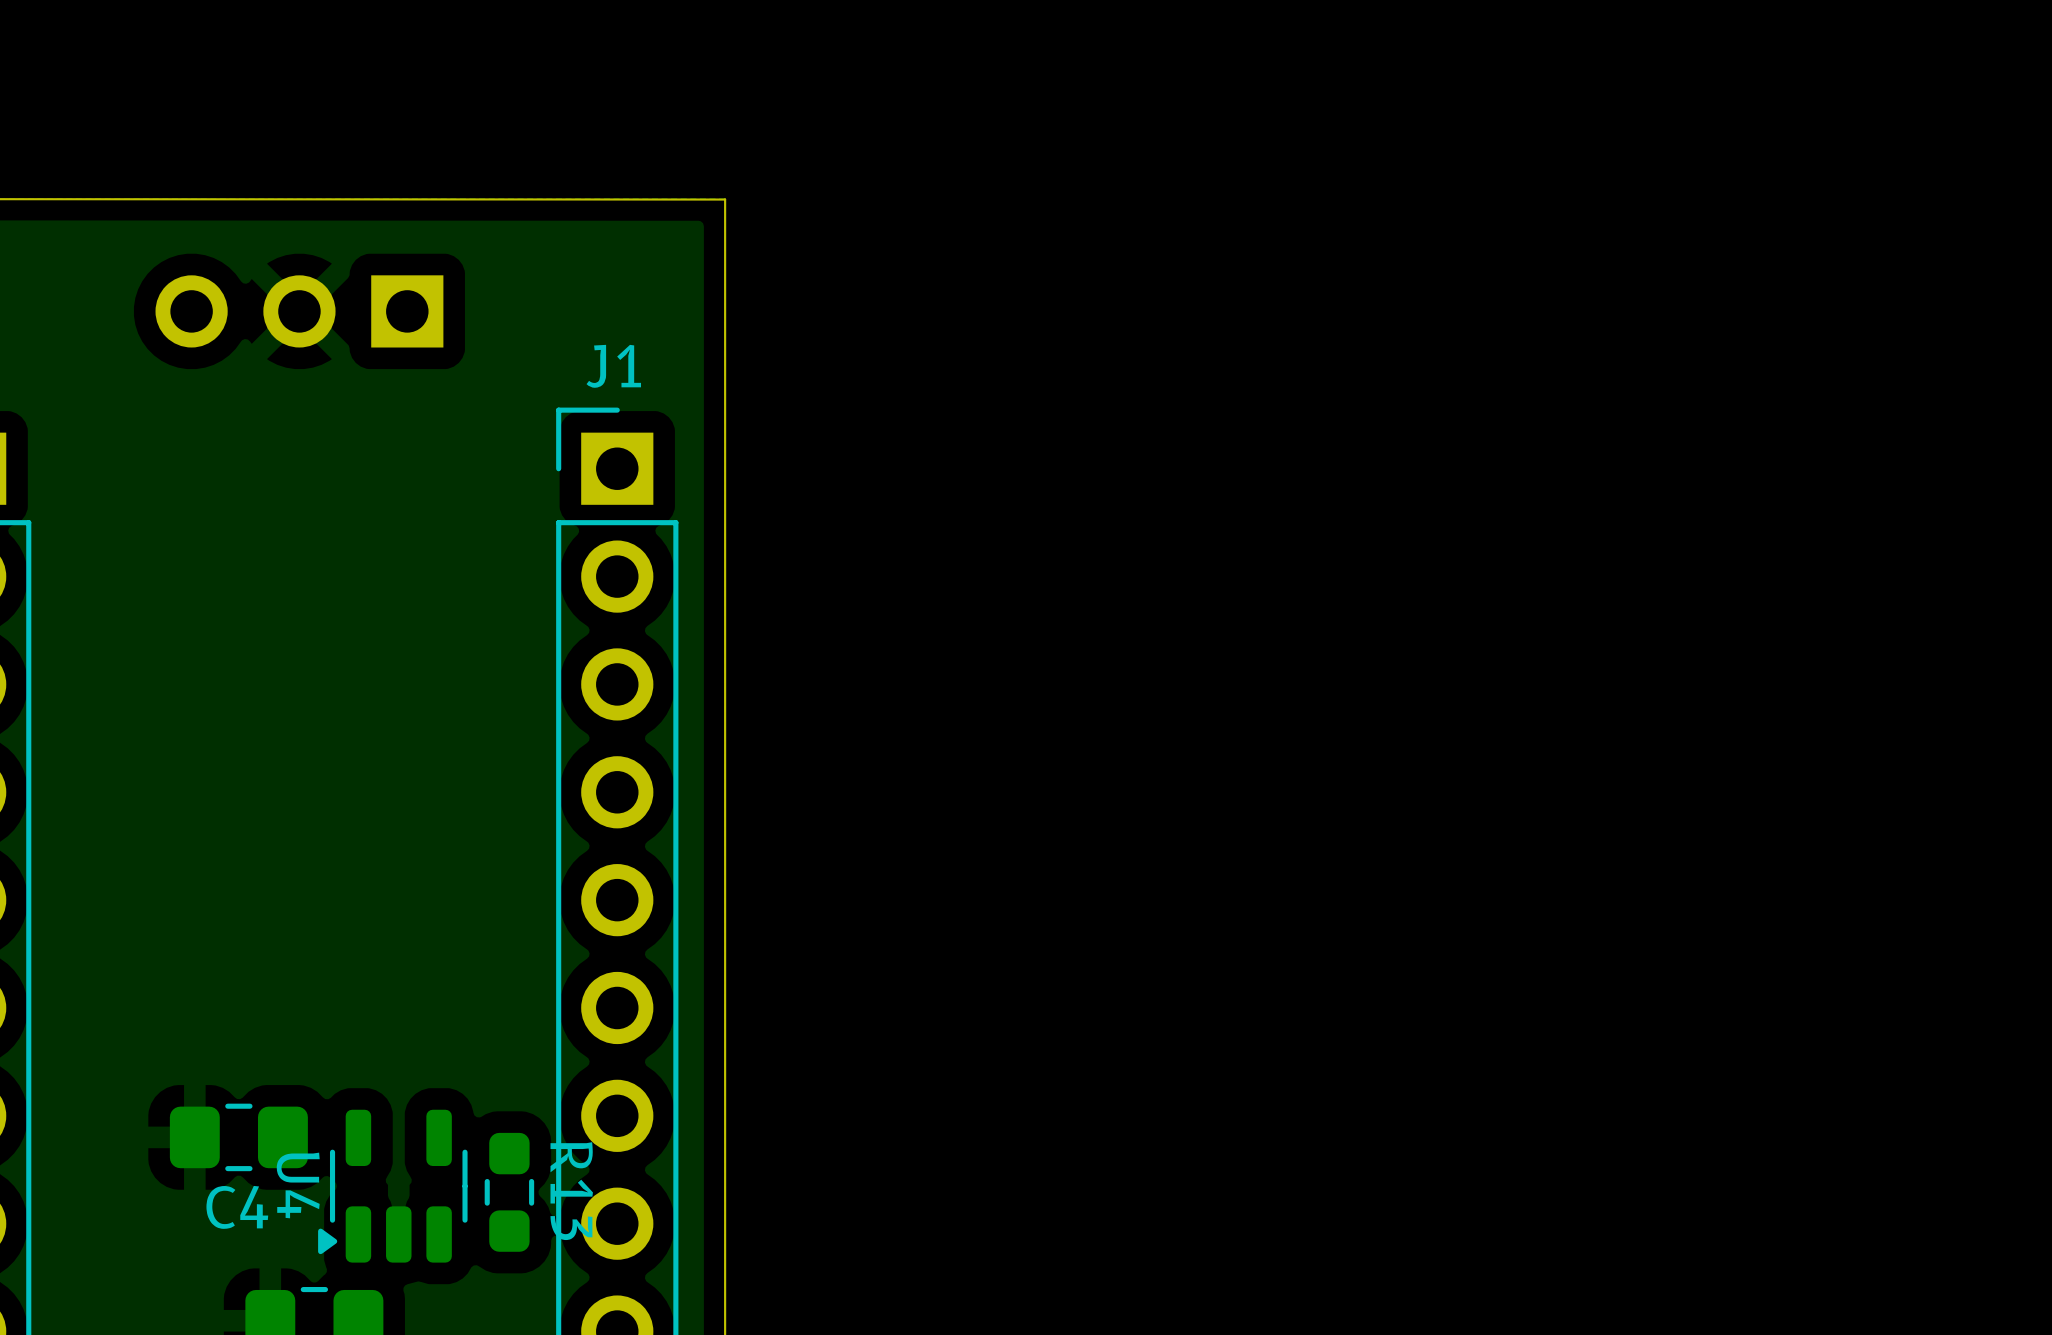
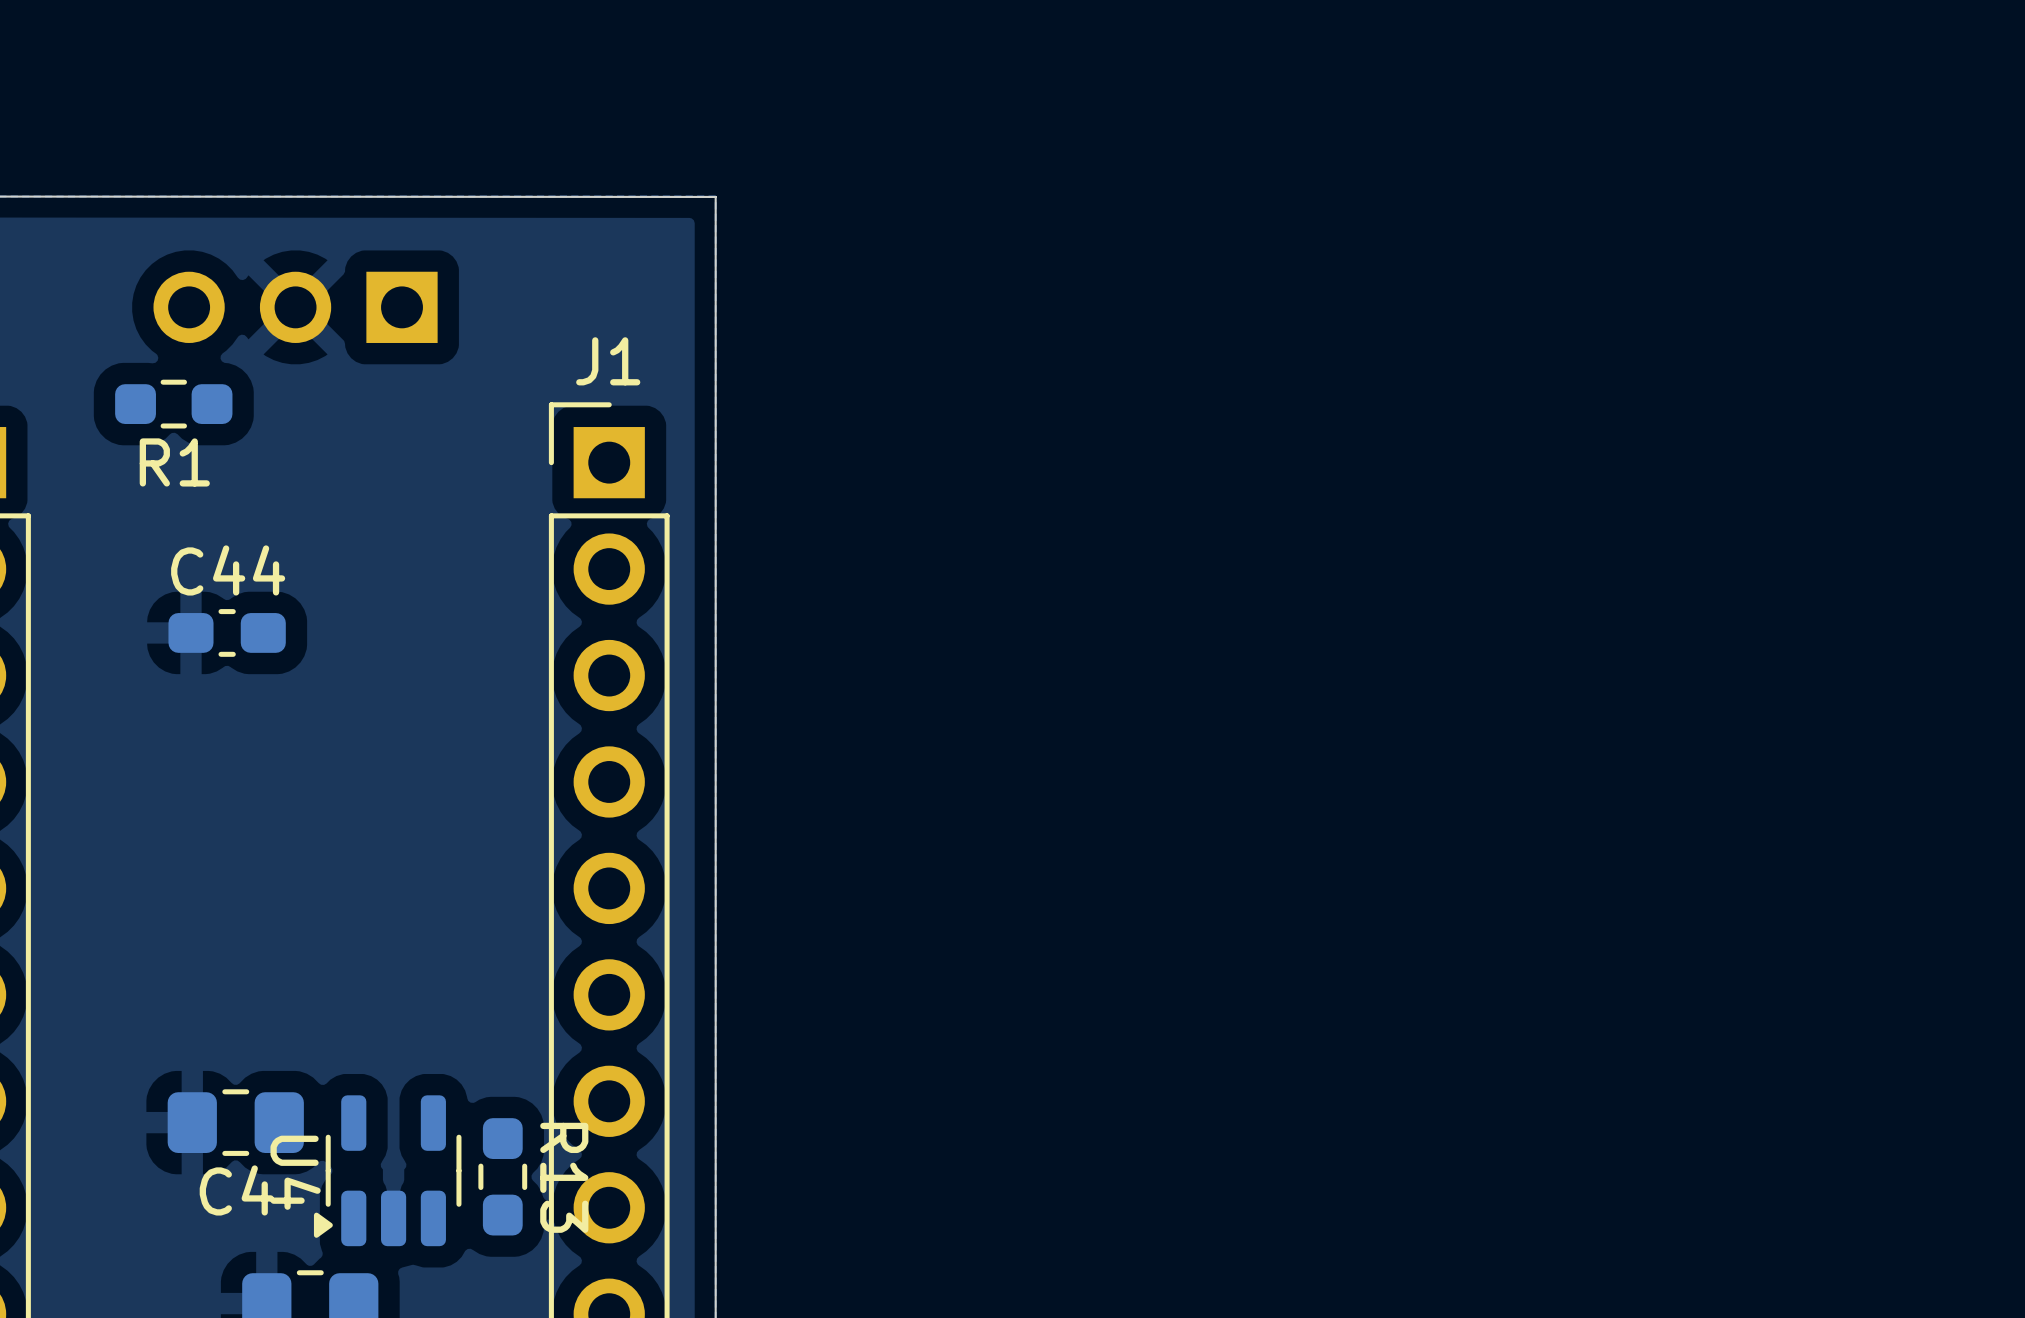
R1: none -> (173, 404)
C44: none -> (227, 632)

